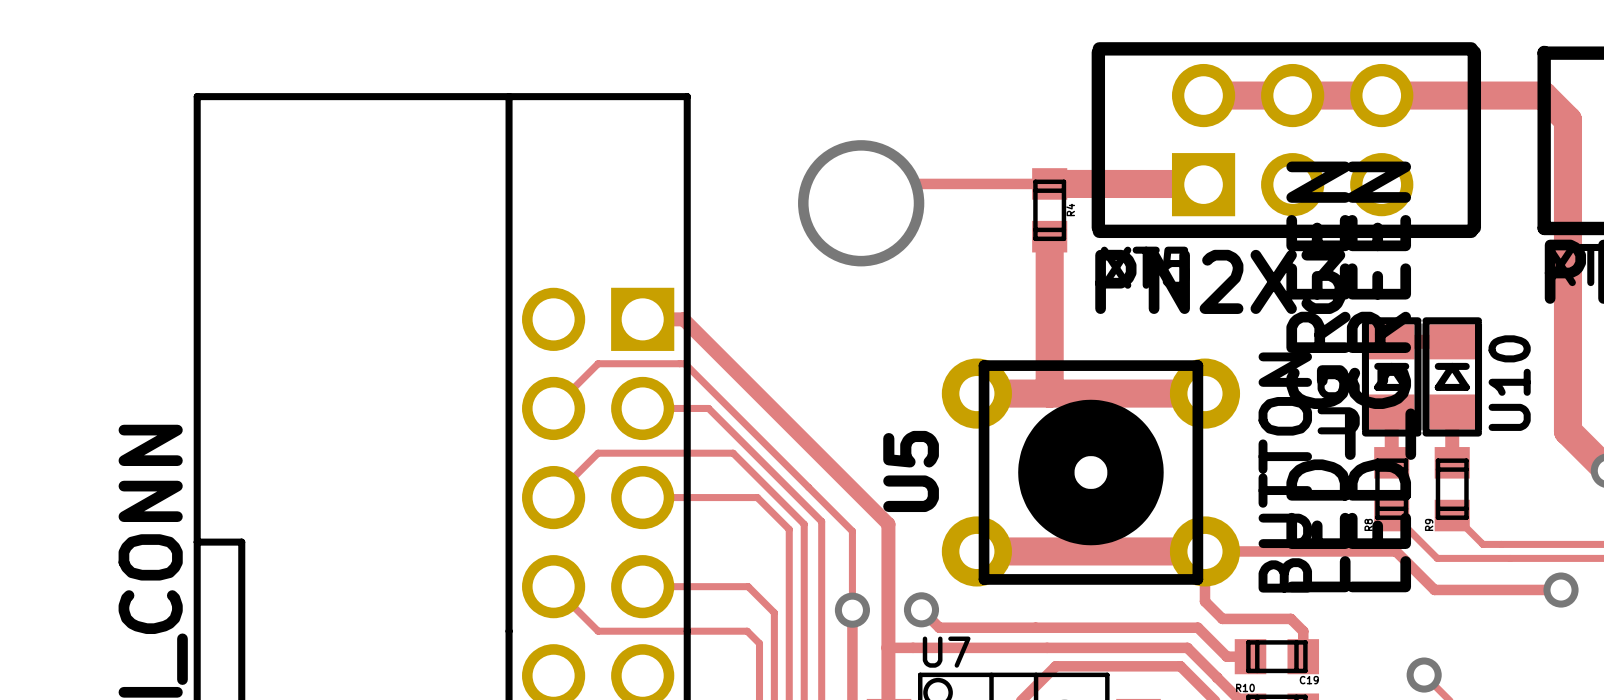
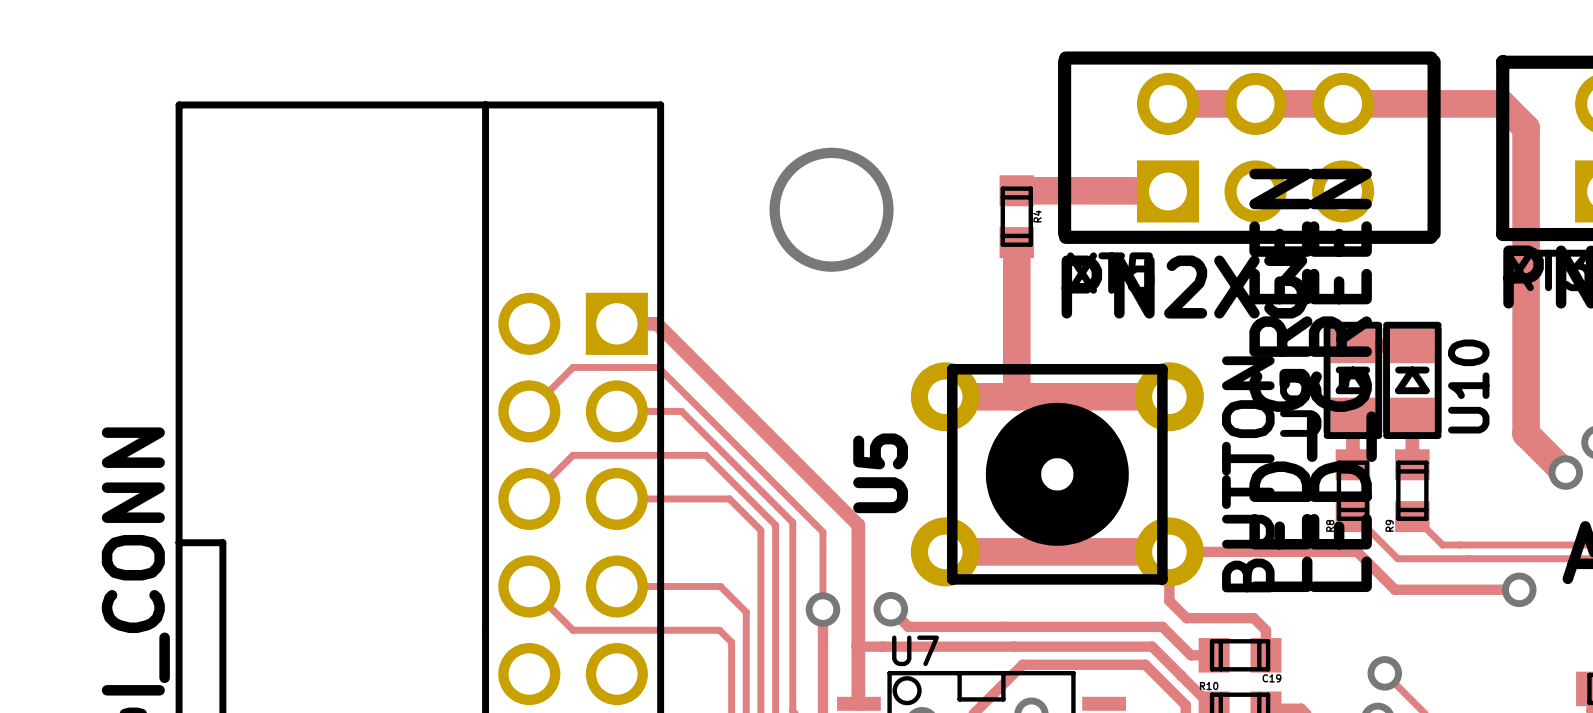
track: (1049, 183) (881, 183) (861, 203) -> none

